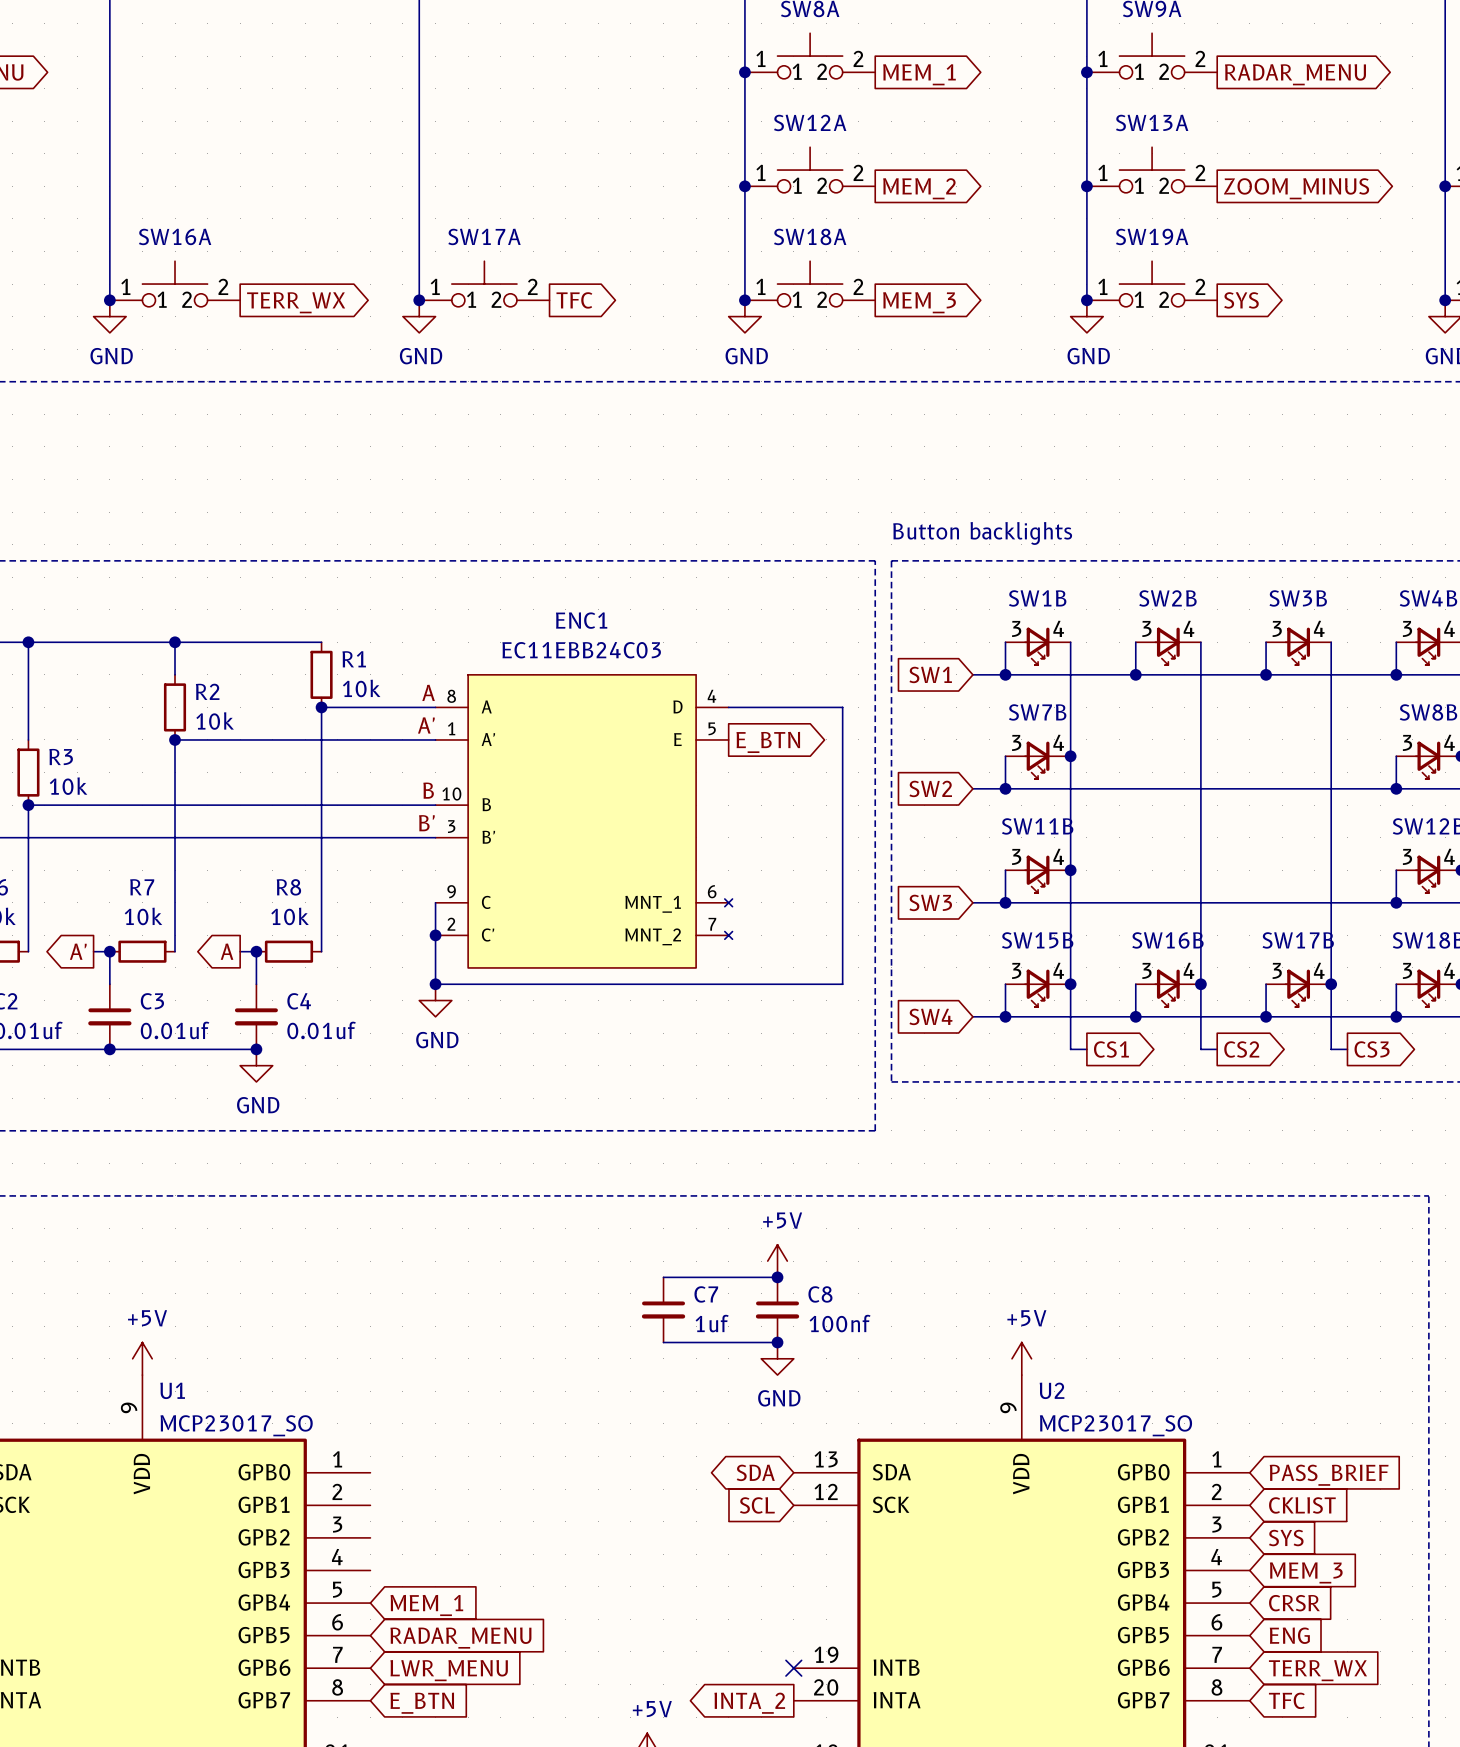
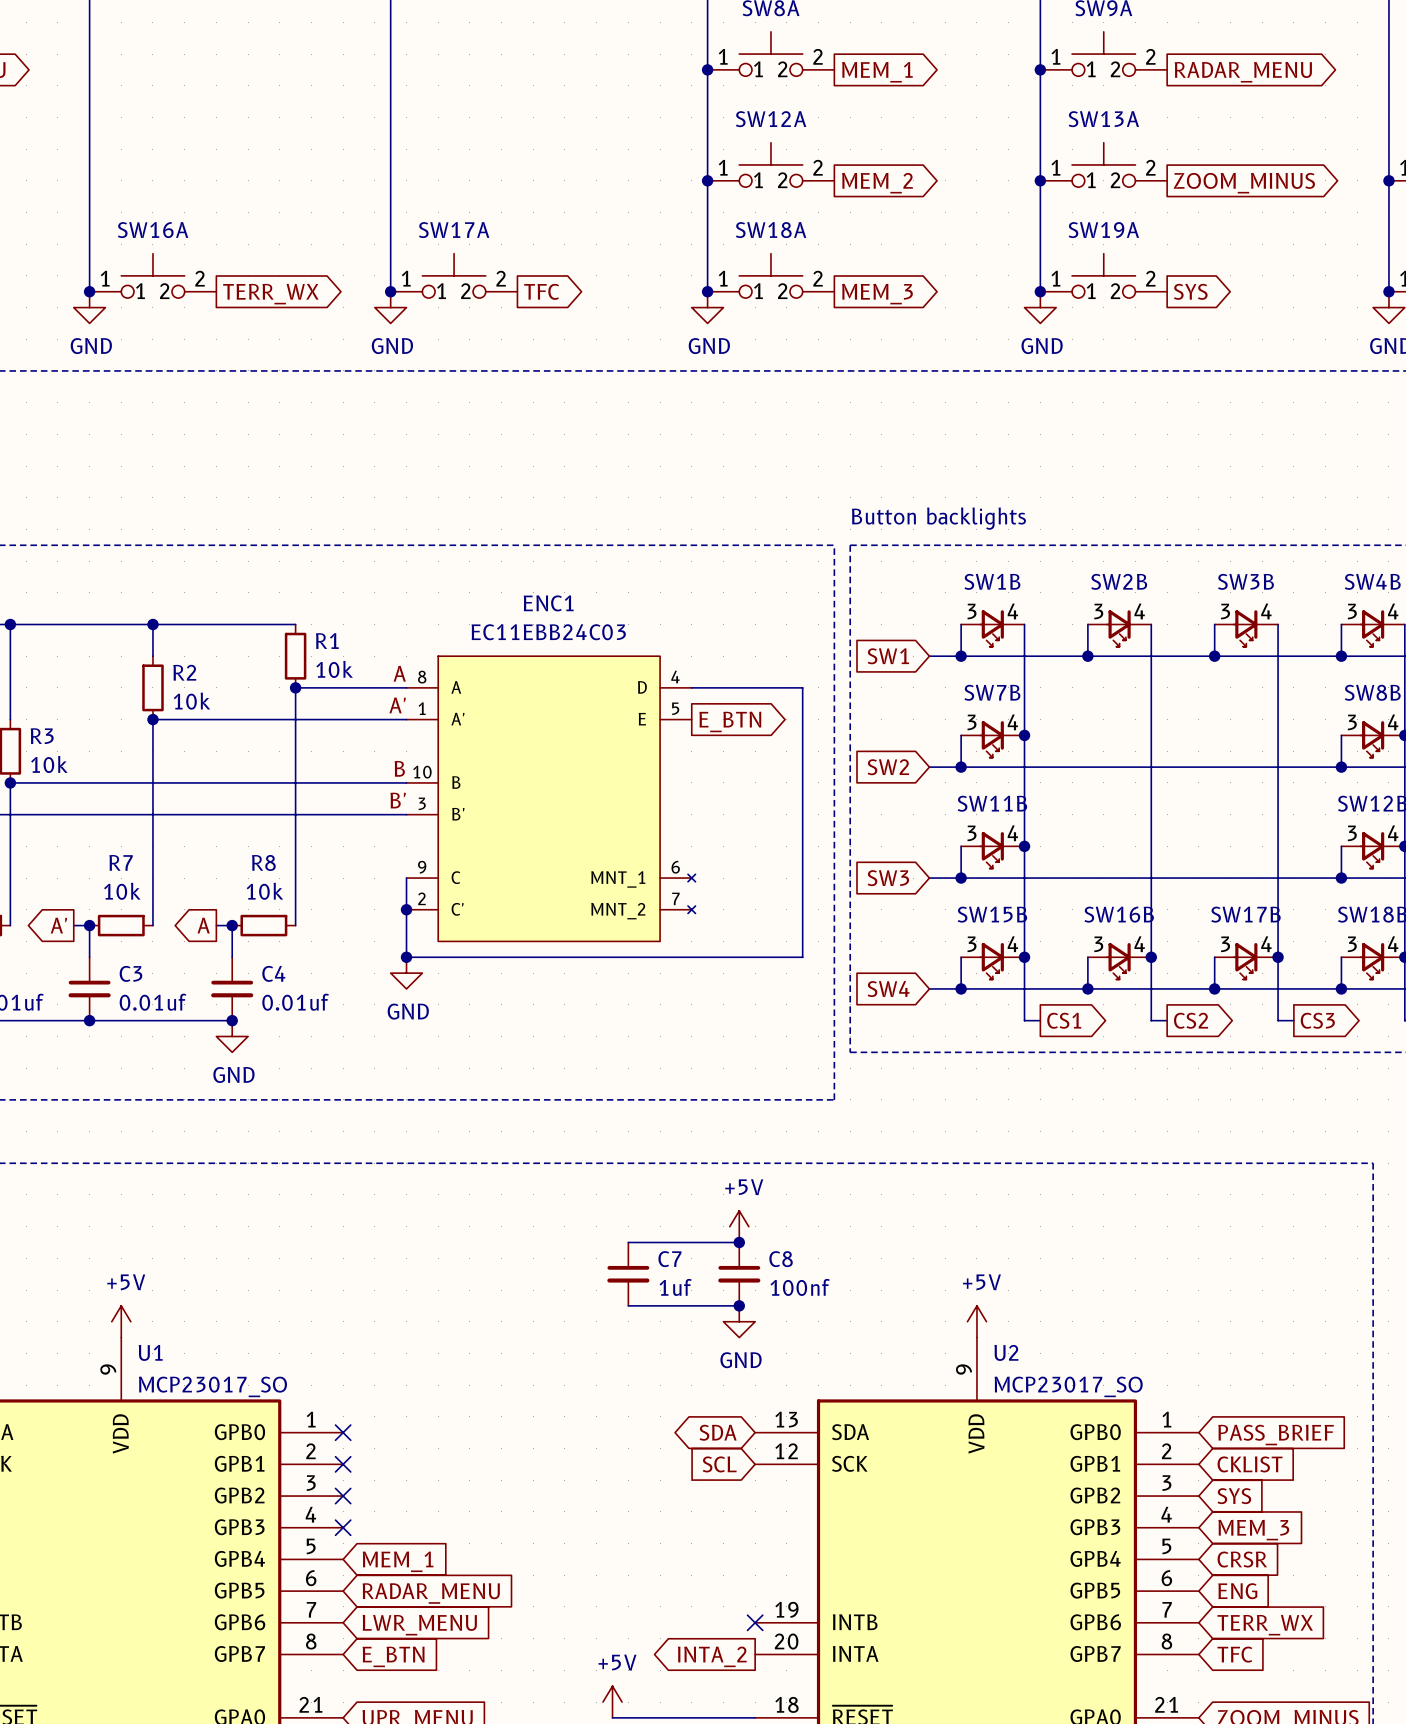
no-connect mark: none -> (343, 1432)
no-connect mark: none -> (343, 1464)
no-connect mark: none -> (343, 1496)
no-connect mark: none -> (343, 1527)

